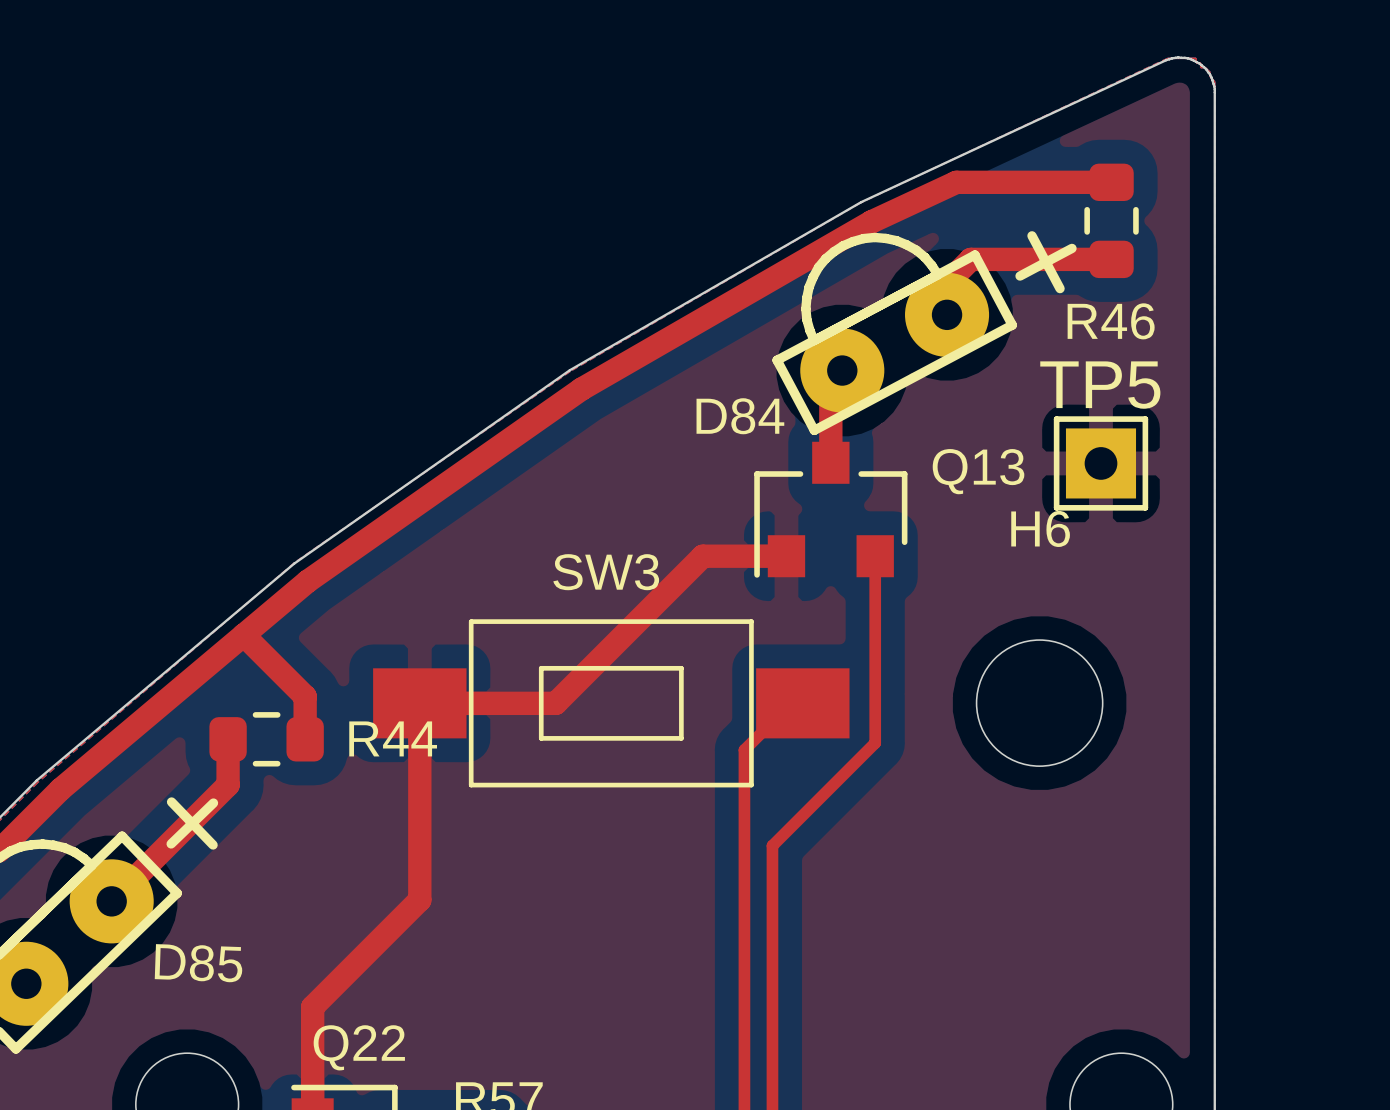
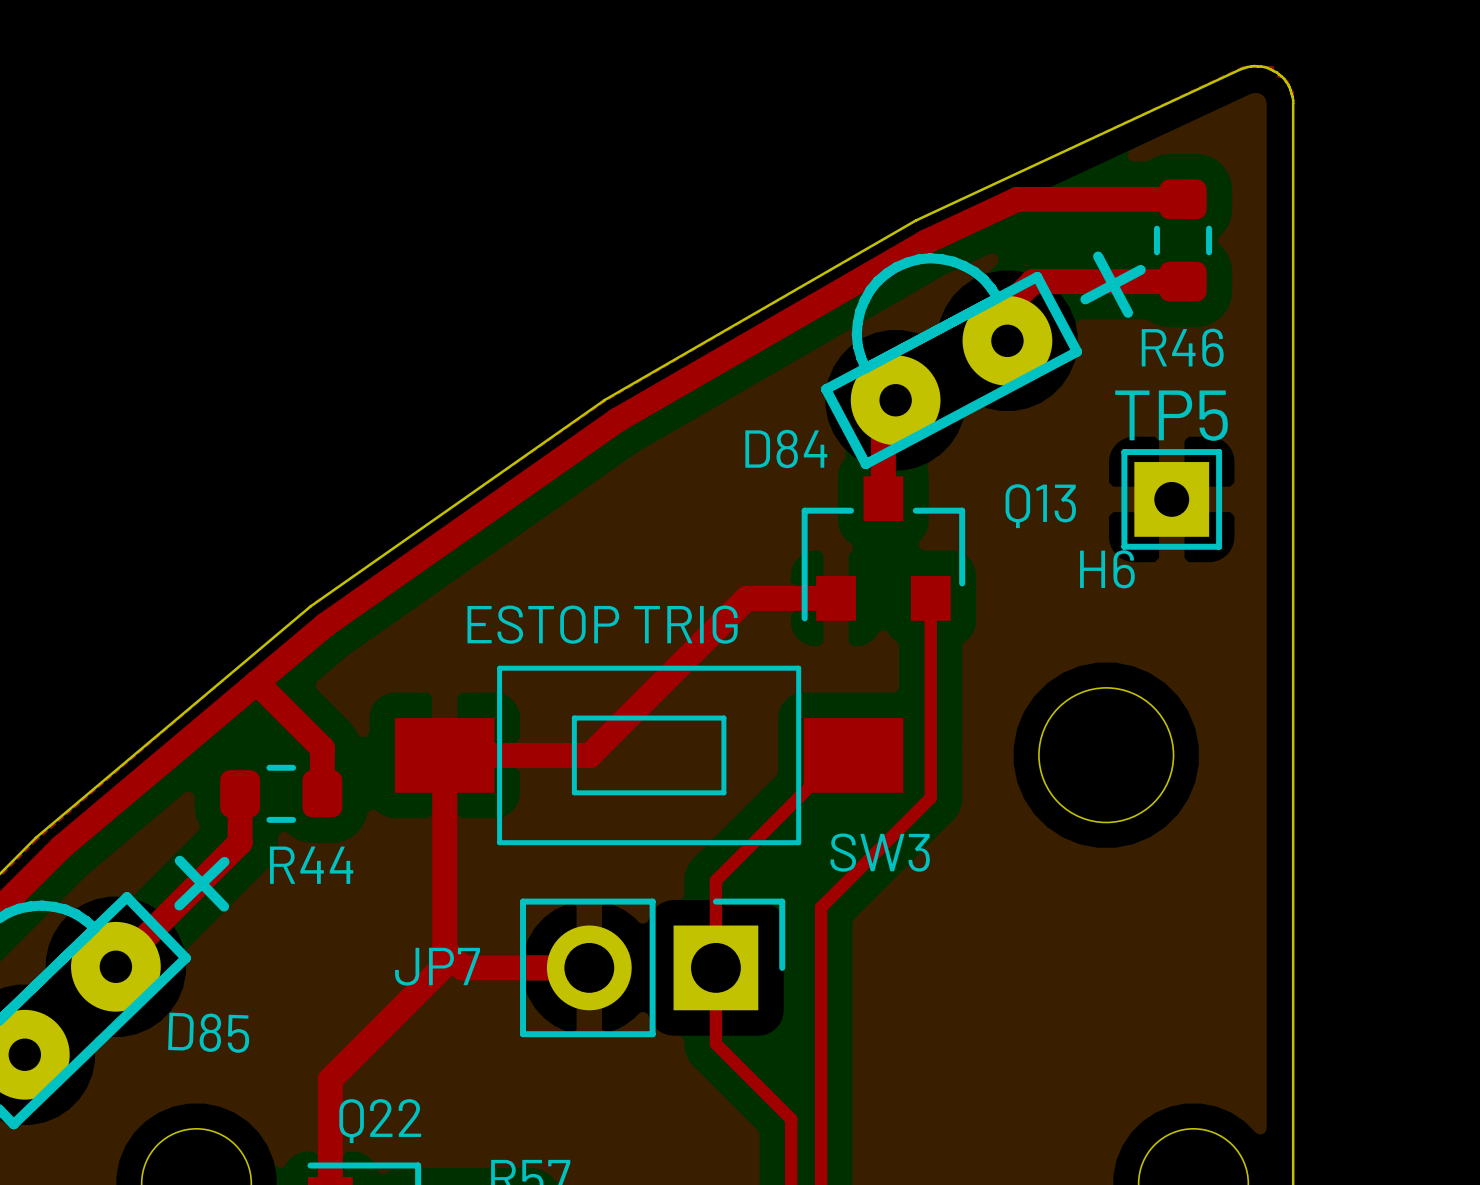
SW3 name position: SW3 (606, 572) -> SW3 (880, 852)
text: none -> ESTOP TRIG (602, 624)
R44 name position: R44 (393, 738) -> R44 (311, 865)
top track: (744, 750) (744, 1044) -> (791, 805) (715, 880) (715, 1043) (791, 1119)
top track: none -> (444, 949) (462, 967) (589, 967)
JP7: none -> (652, 967)

